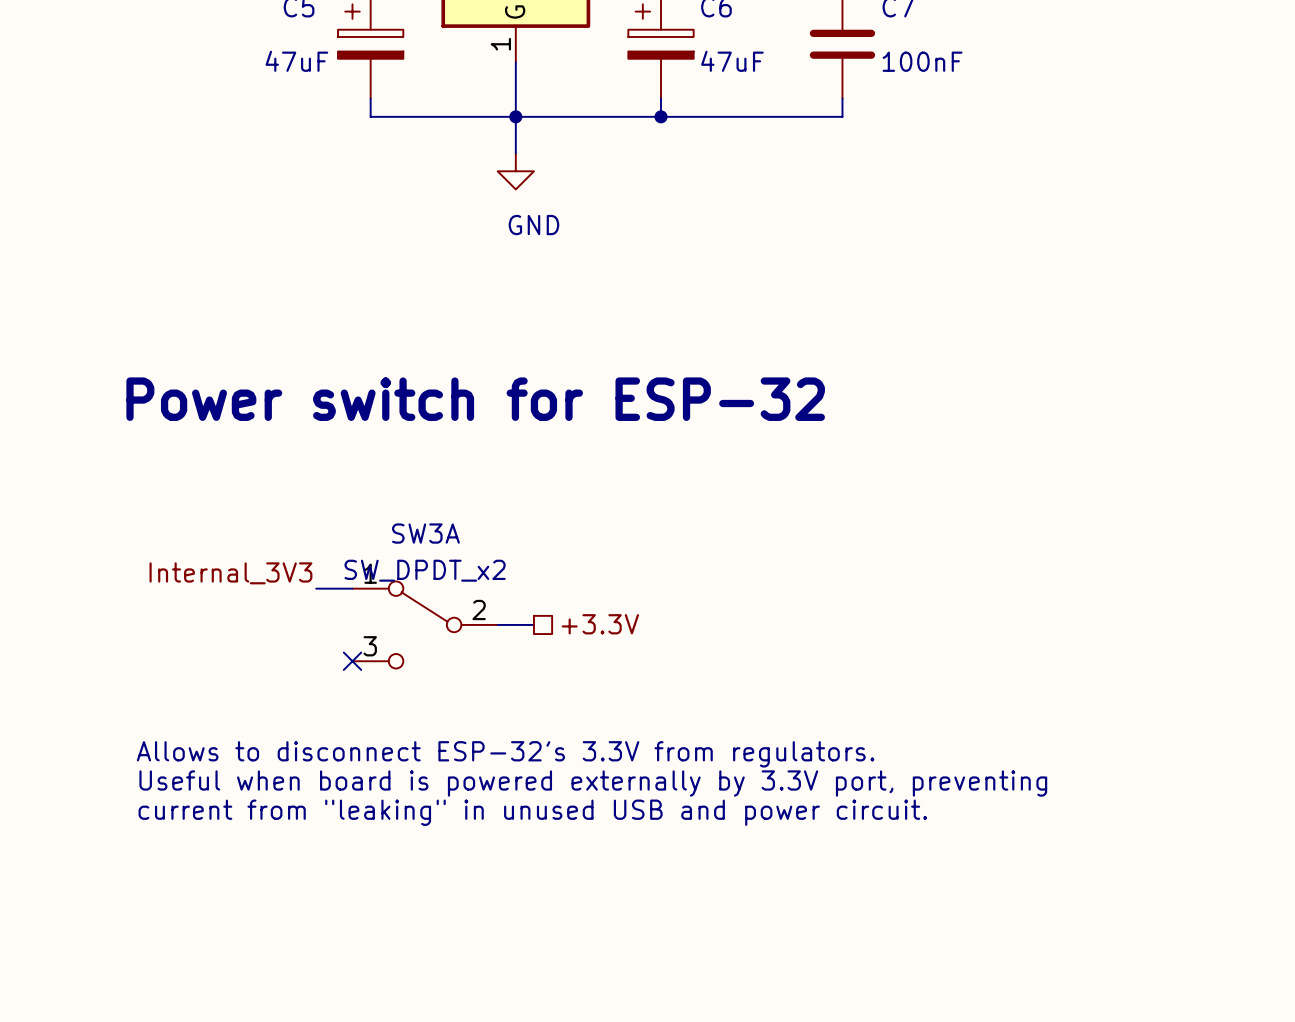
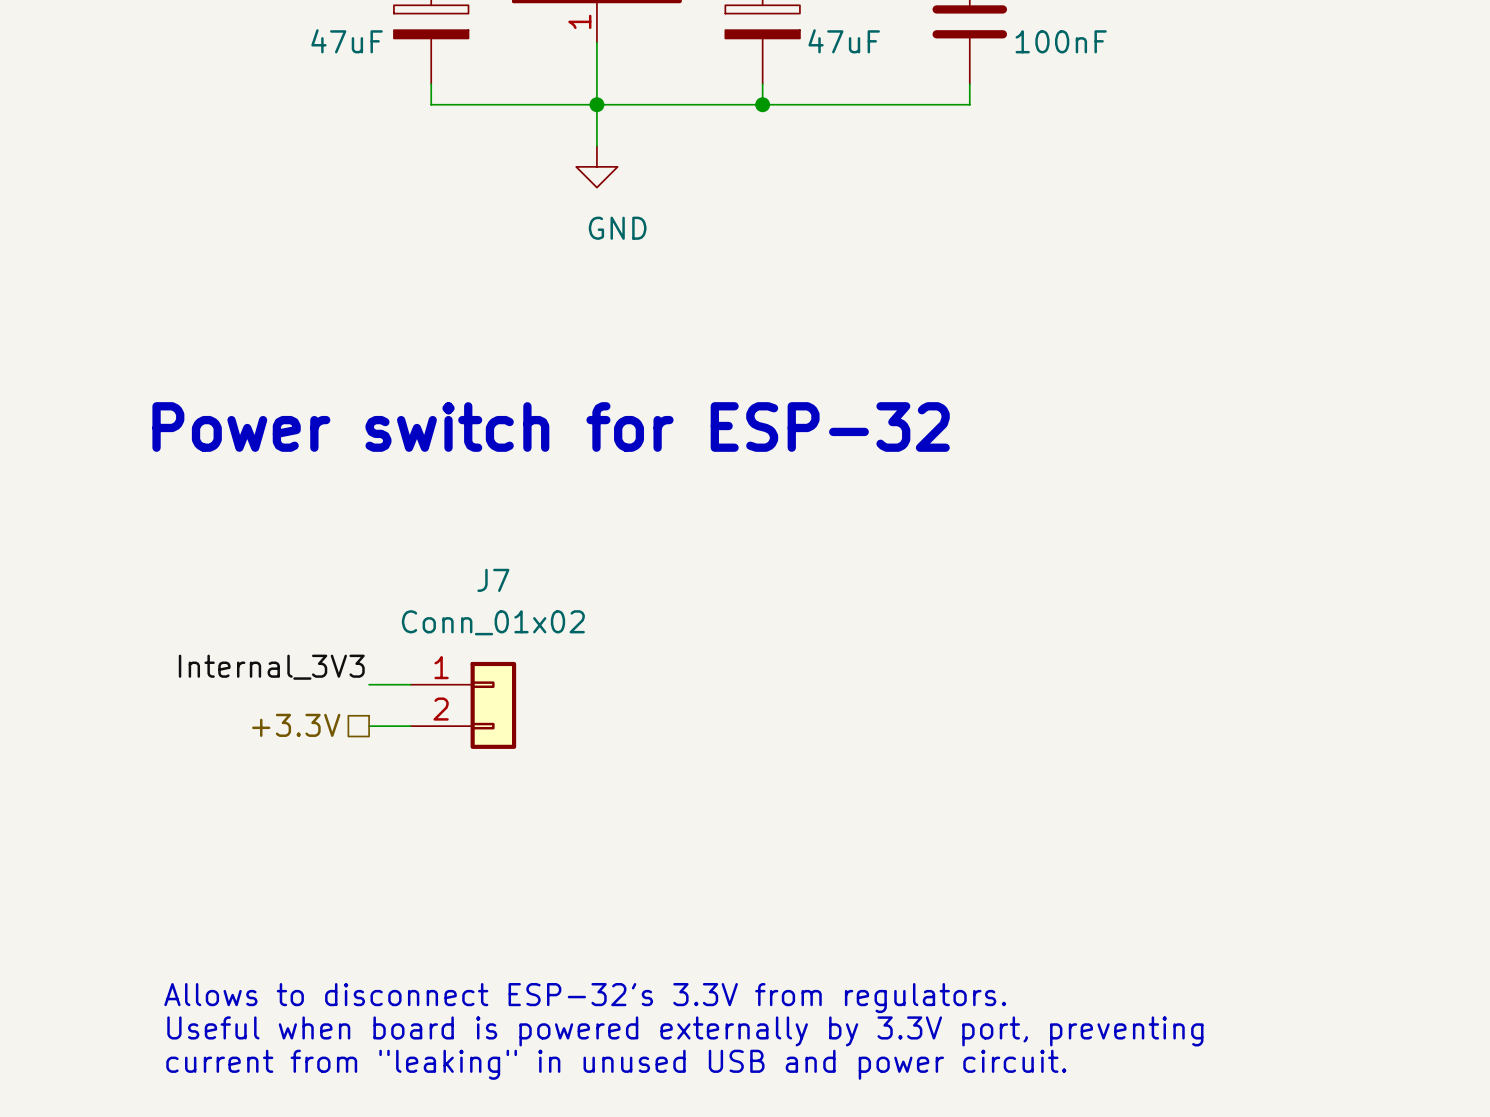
label position: Internal_3V3 (230, 573) -> Internal_3V3 (271, 667)
wire: (316, 588) (352, 588) -> (369, 684) (410, 684)
SW3A: SW_DPDT_x2 (425, 624) -> none
wire: (497, 624) (533, 624) -> (369, 726) (410, 726)
hierarchical label rotation: 0° (600, 624) -> 180° (296, 725)
hierarchical label position: +3.3V (600, 624) -> +3.3V (296, 725)
J7: none -> Conn_01x02 (463, 705)
no-connect mark: (352, 661) -> none
text position: Allows to disconnect ESP-32's 3.3V from regulators. (505, 754) -> Allows to disconnect ESP-32's 3.3V from regulators. (585, 998)
text position: Useful when board is powered externally by 3.3V port, preventing (593, 783) -> Useful when board is powered externally by 3.3V port, preventing (685, 1031)
text position: current from "leaking" in unused USB and power circuit. (532, 812) -> current from "leaking" in unused USB and power circuit. (616, 1064)

